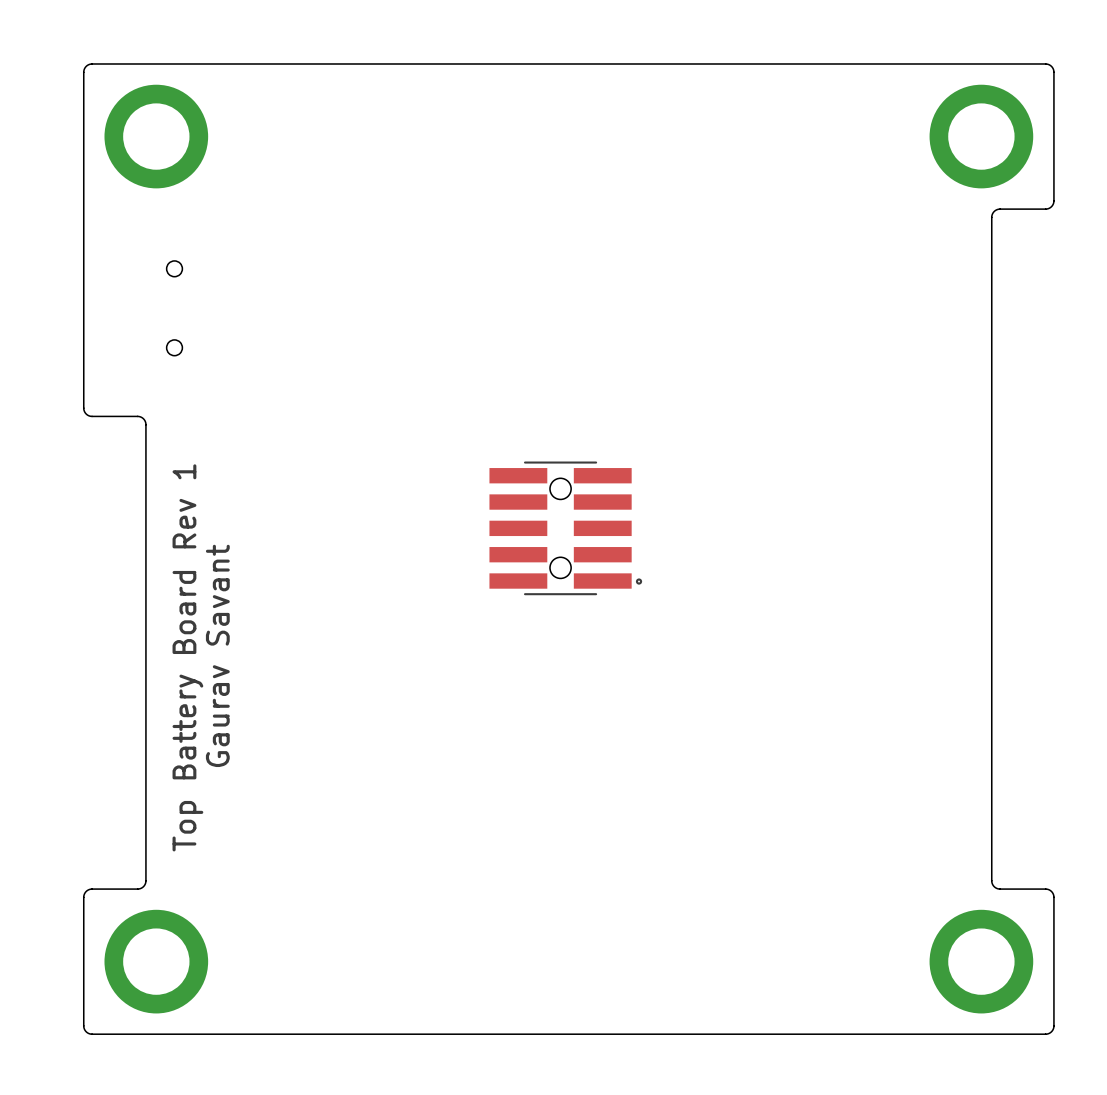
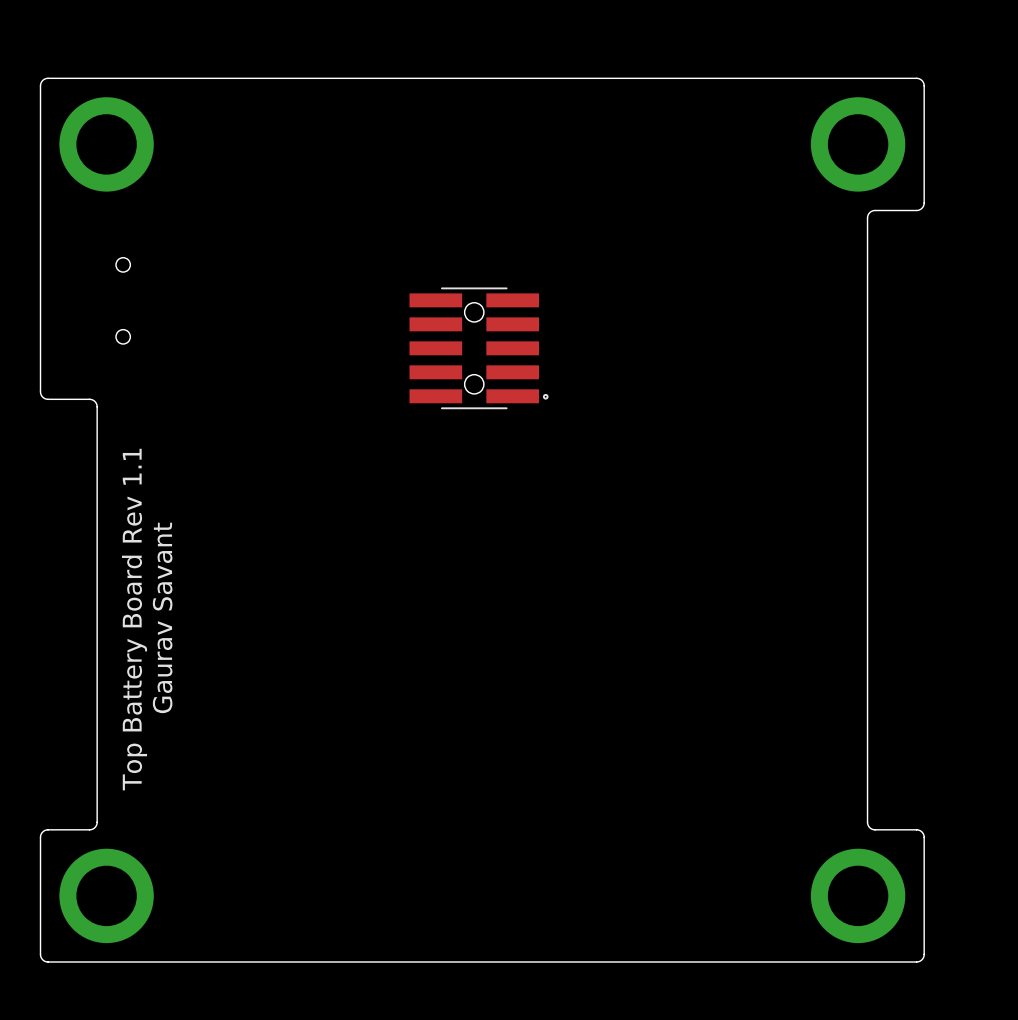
part position: (565, 528) -> (479, 348)
text: Top Battery Board Rev 1 (187, 657) -> Top Battery Board Rev 1.1 (134, 619)

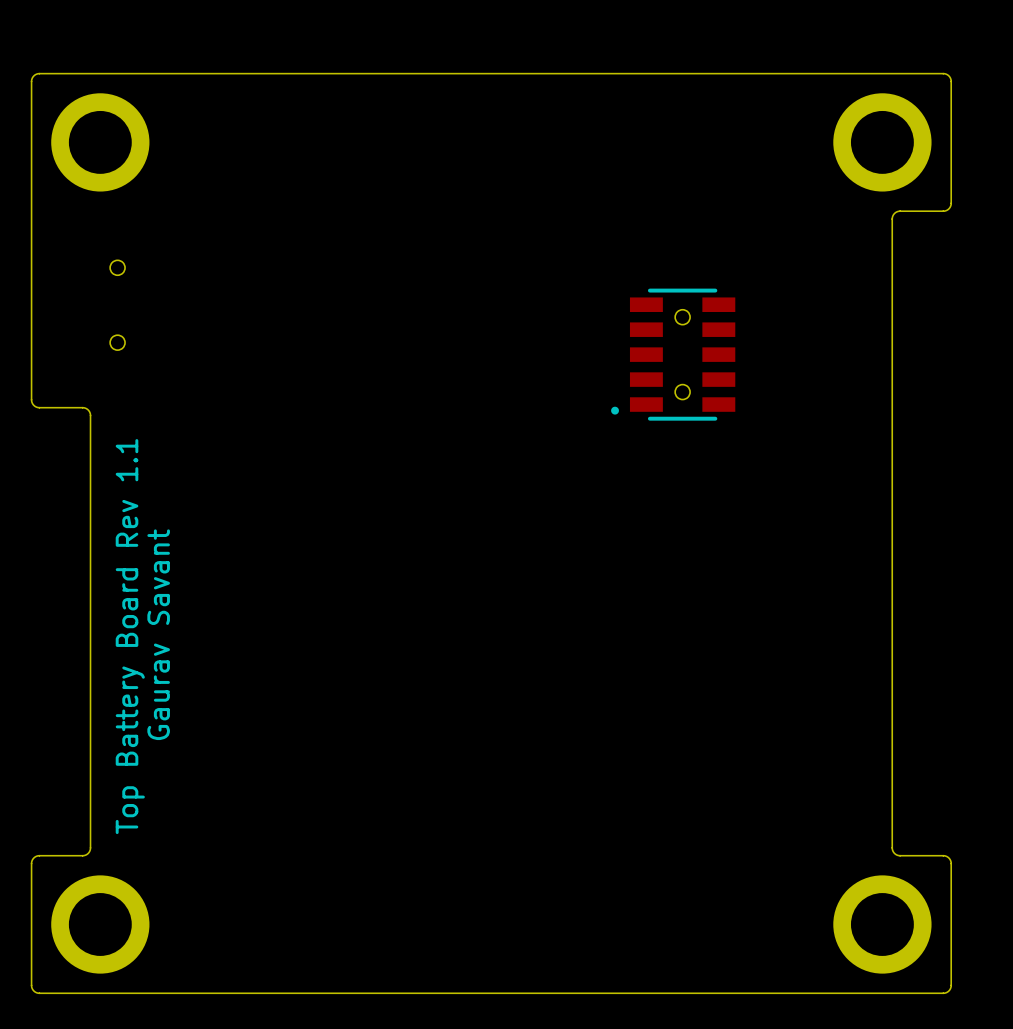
part: (479, 348) -> none
part: none -> (673, 354)

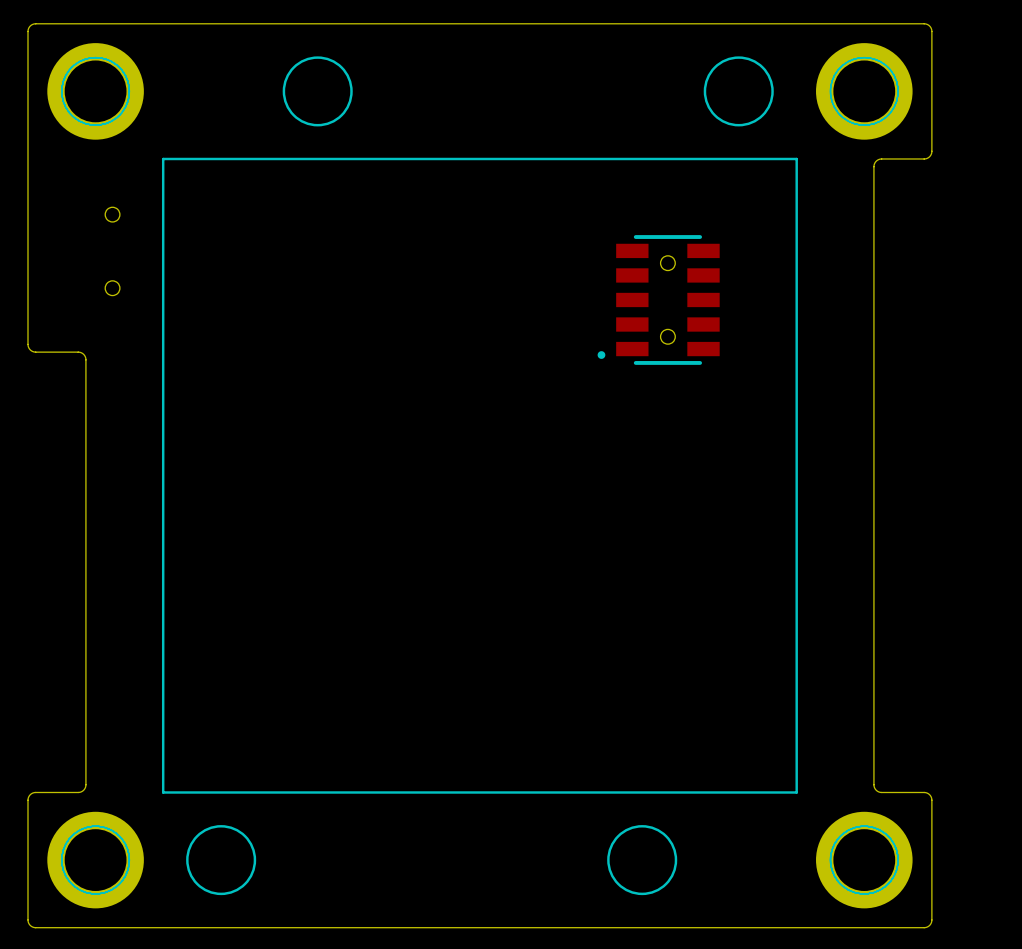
drawing: none -> [282, 56, 353, 127]
drawing: none -> [703, 56, 774, 127]
drawing: none -> [61, 57, 130, 126]
drawing: none -> [830, 57, 899, 126]
line: none -> (163, 158) (796, 158) (796, 792) (163, 792) (163, 158)
text: Gaurav Savant (158, 634) -> none
text: Top Battery Board Rev 1.1 (130, 636) -> none
drawing: none -> [186, 825, 257, 896]
drawing: none -> [607, 825, 678, 896]
drawing: none -> [61, 826, 130, 895]
drawing: none -> [830, 826, 899, 895]

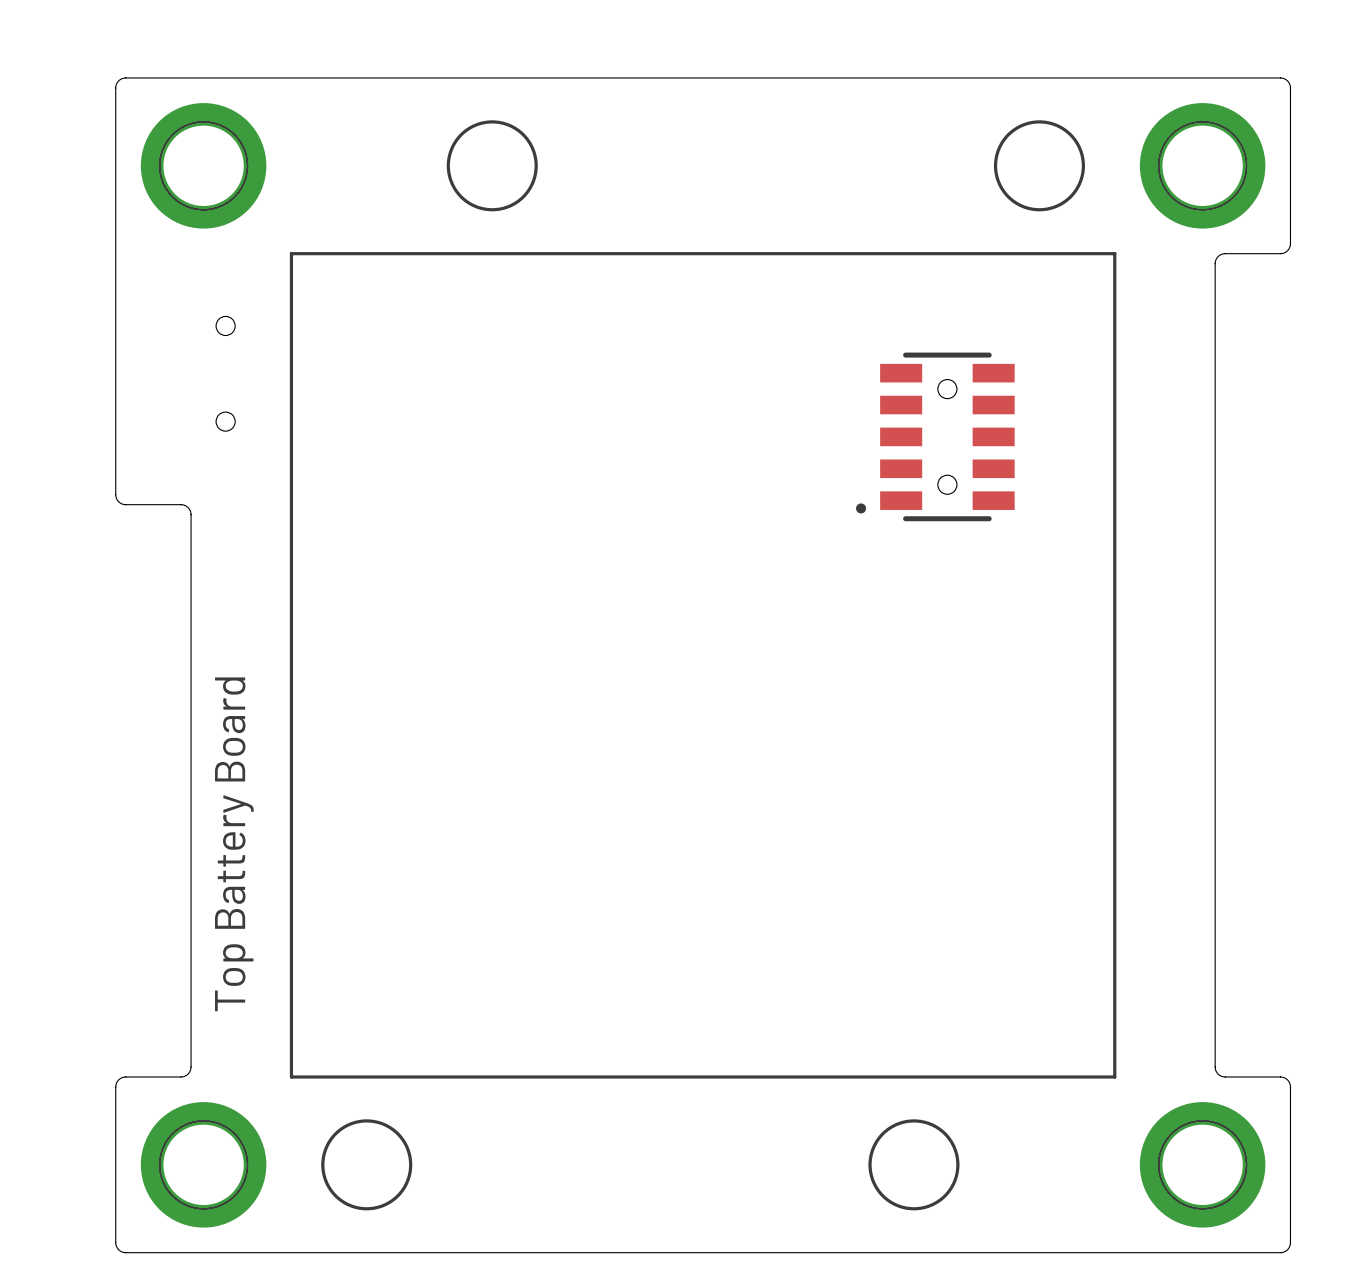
text: none -> Top Battery Board (234, 844)

